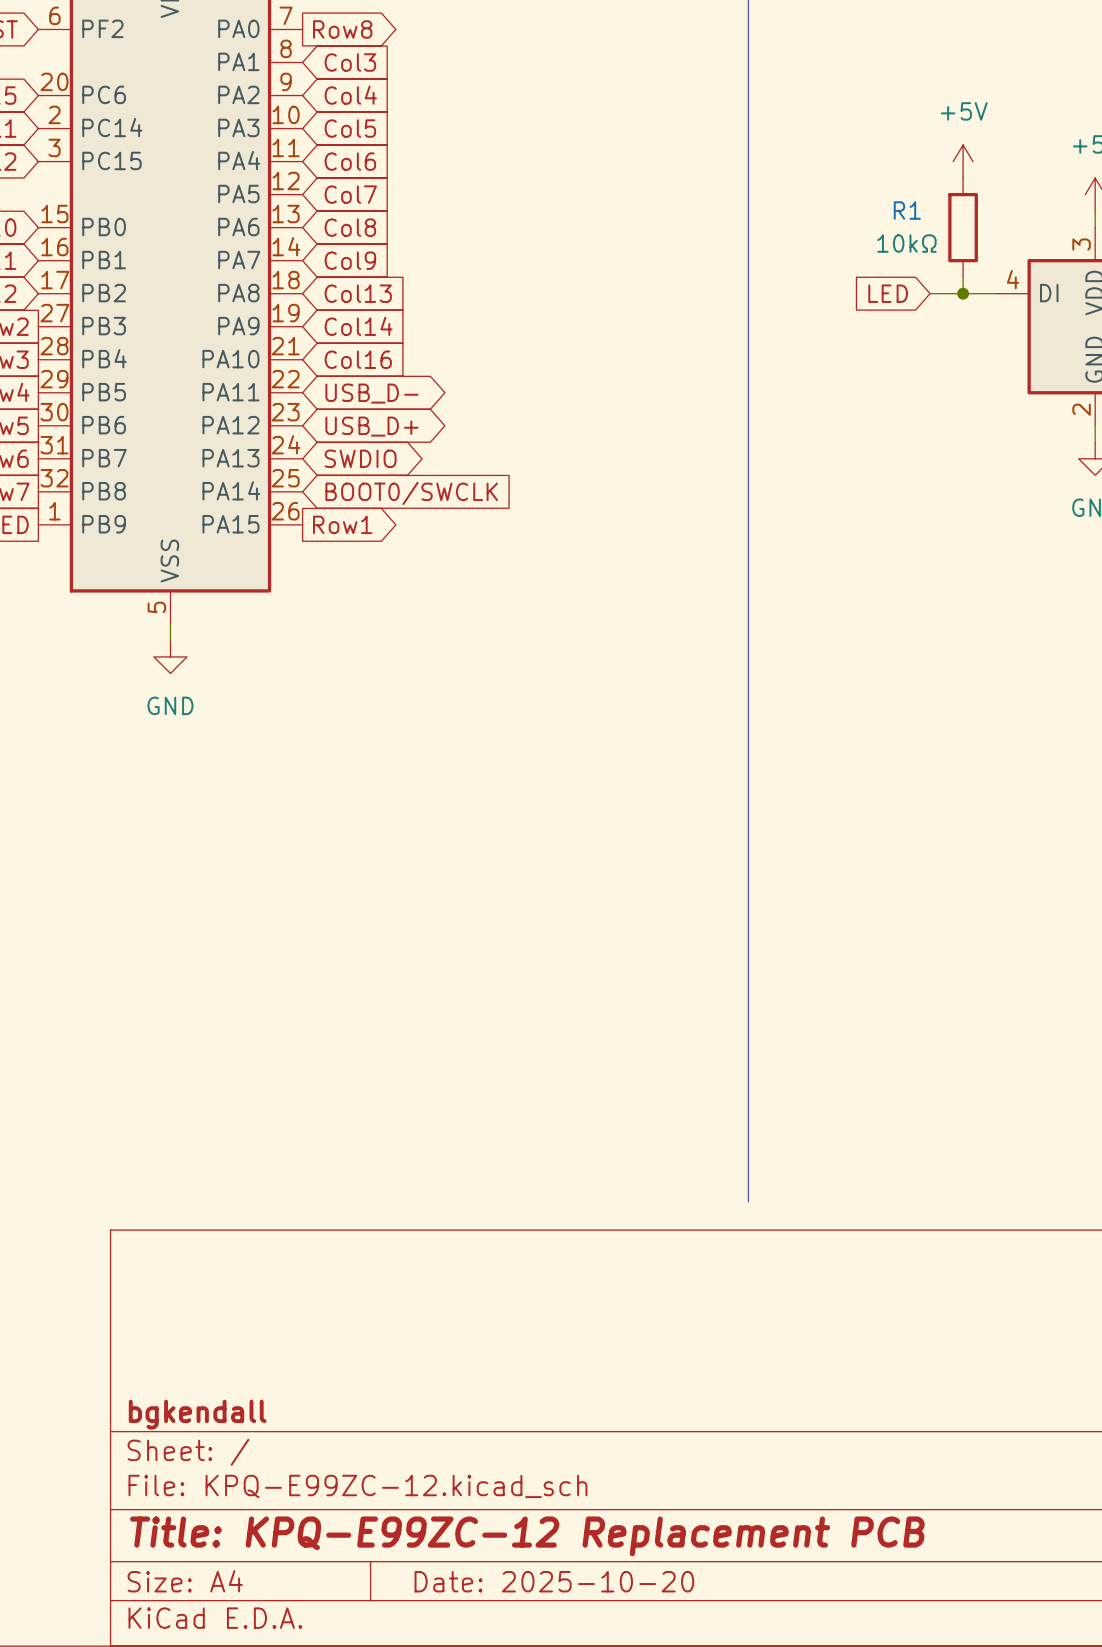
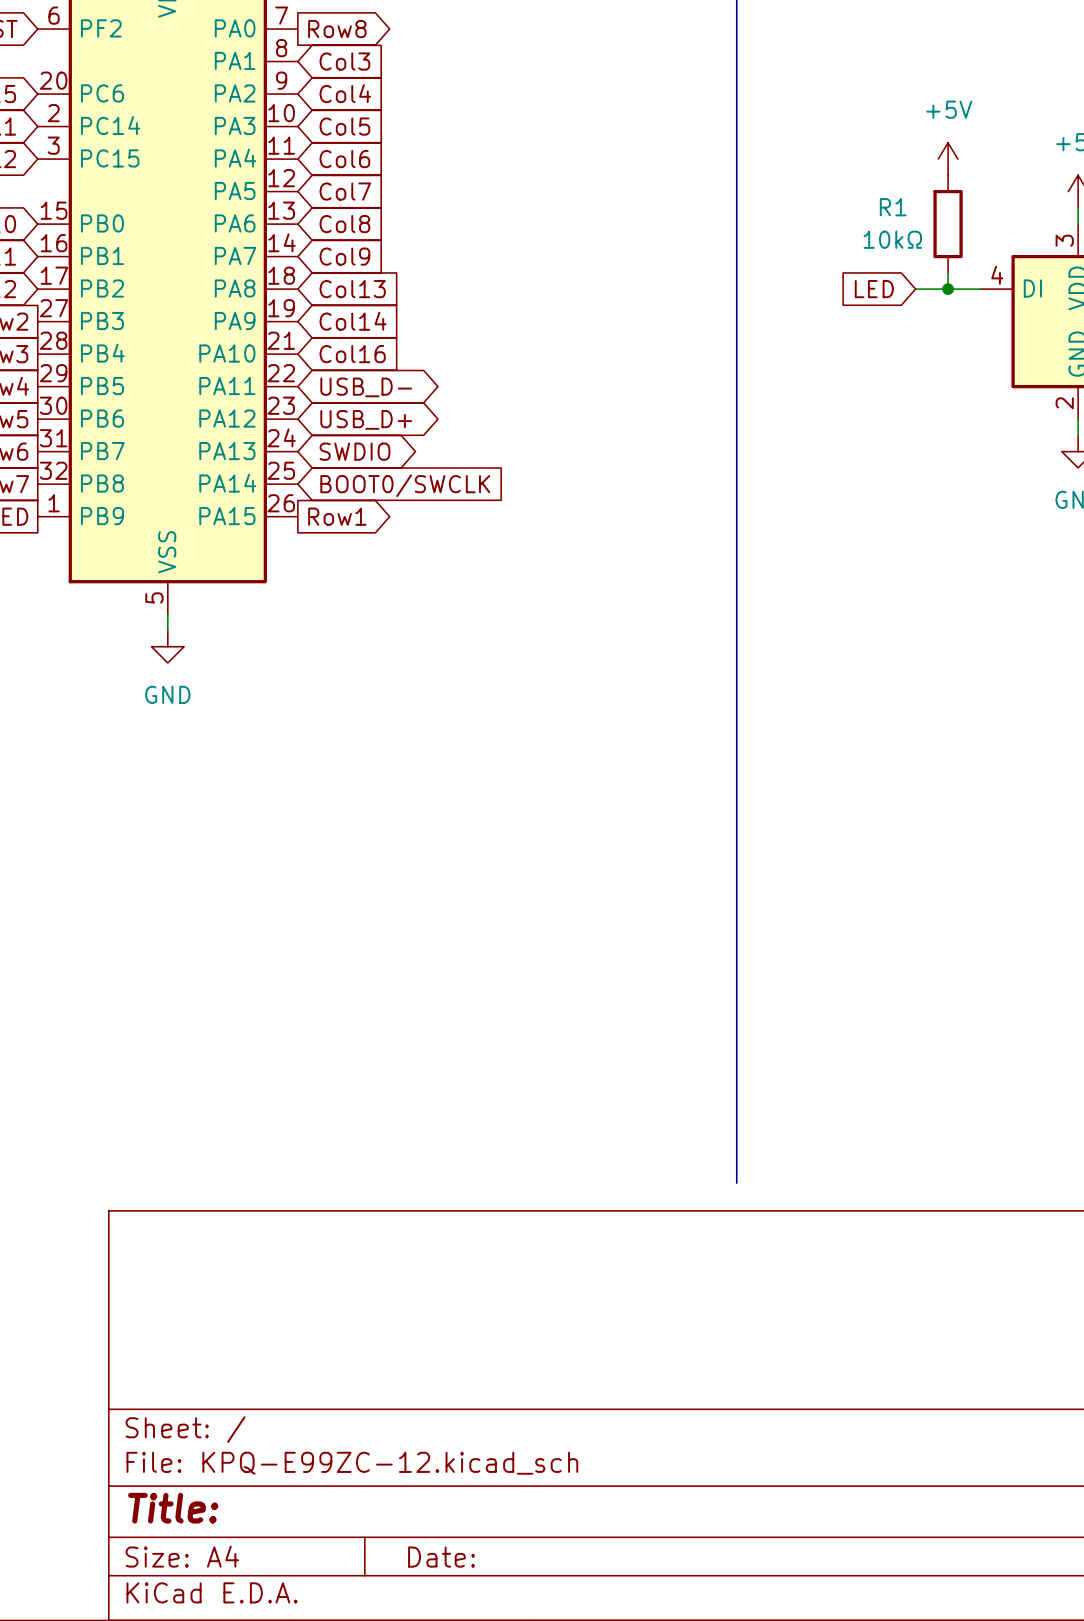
title block: bgkendall (197, 1414) -> none
title block: Title: KPQ-E99ZC-12 Replacement PCB (527, 1536) -> Title: (173, 1508)
title block: Date: 2025-10-20 (554, 1581) -> Date: (441, 1557)

